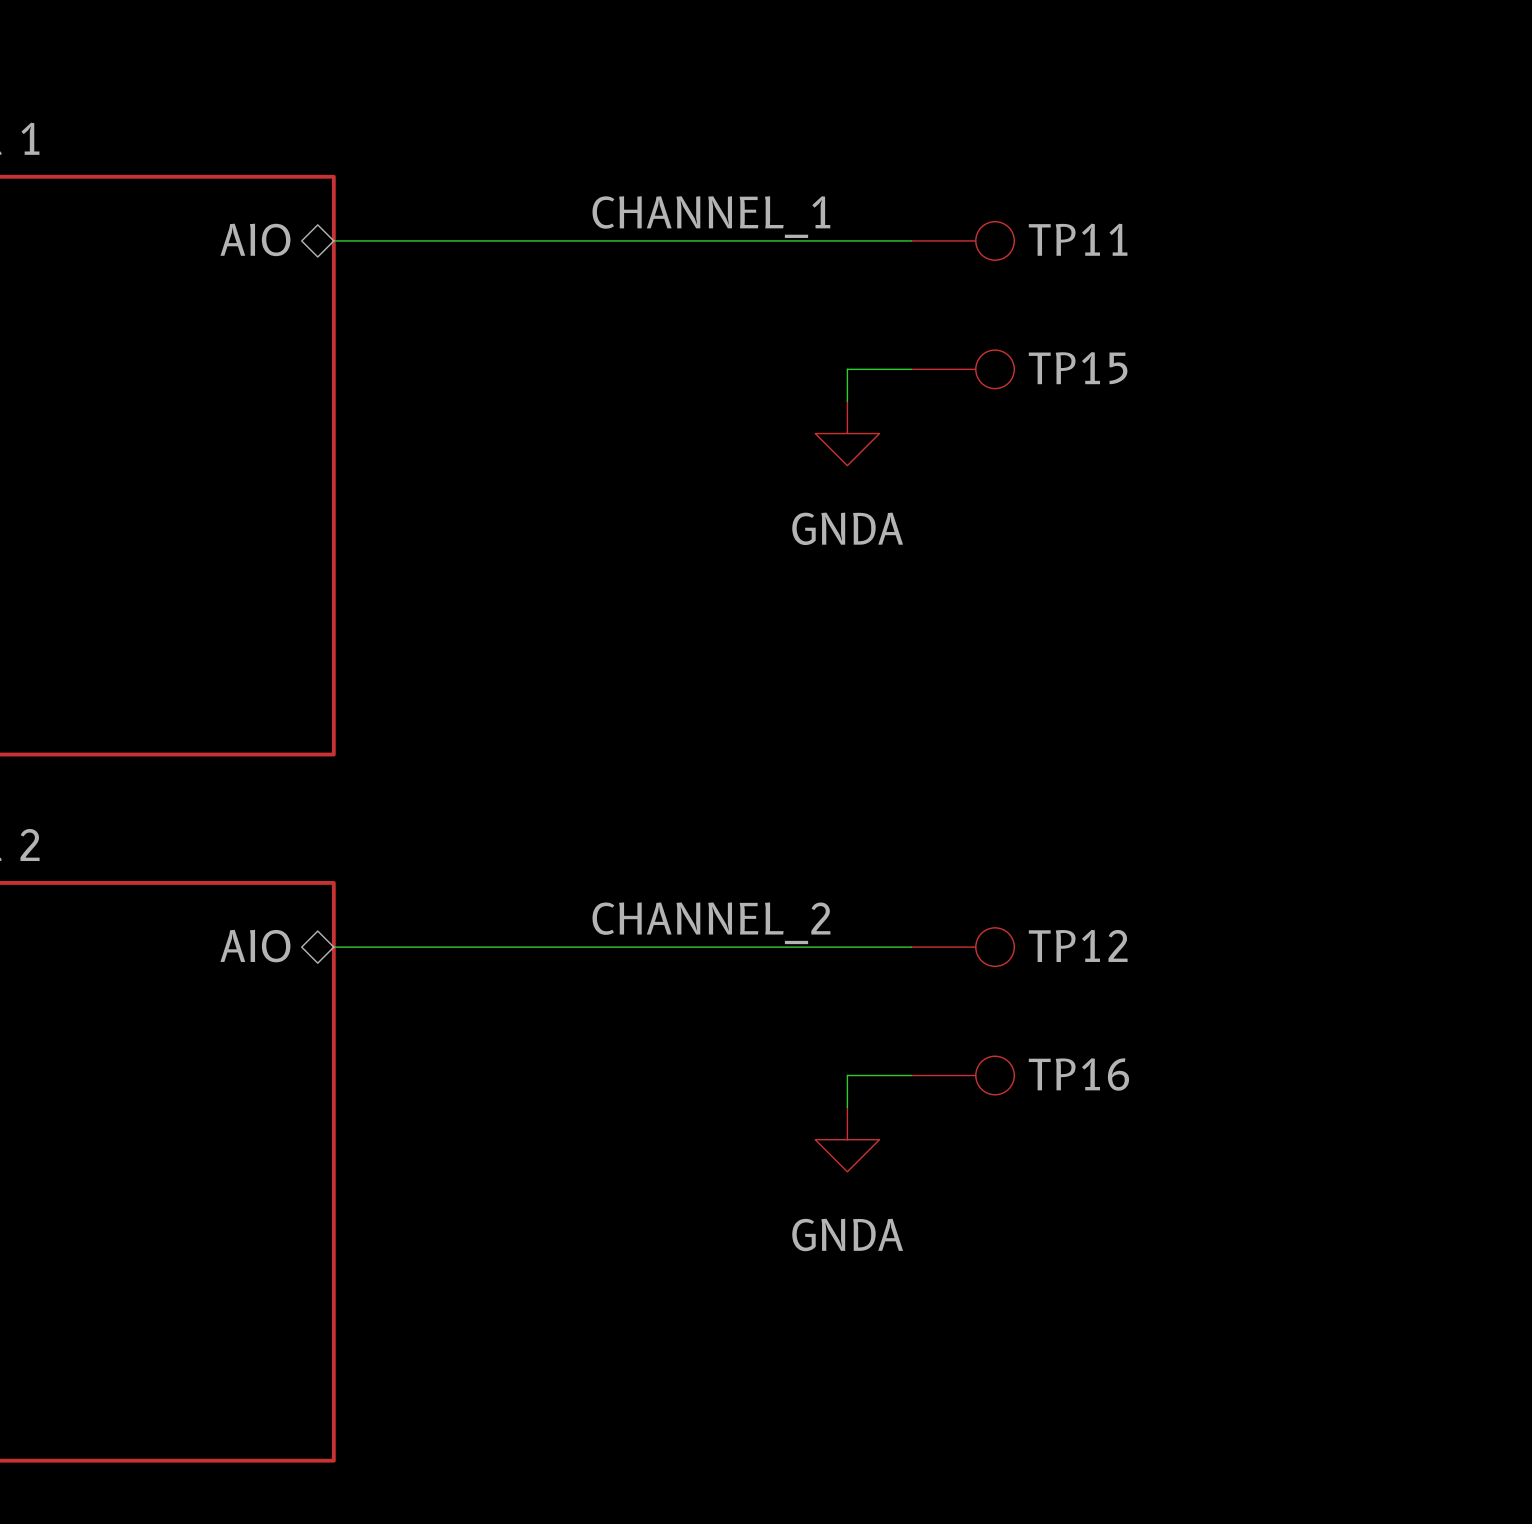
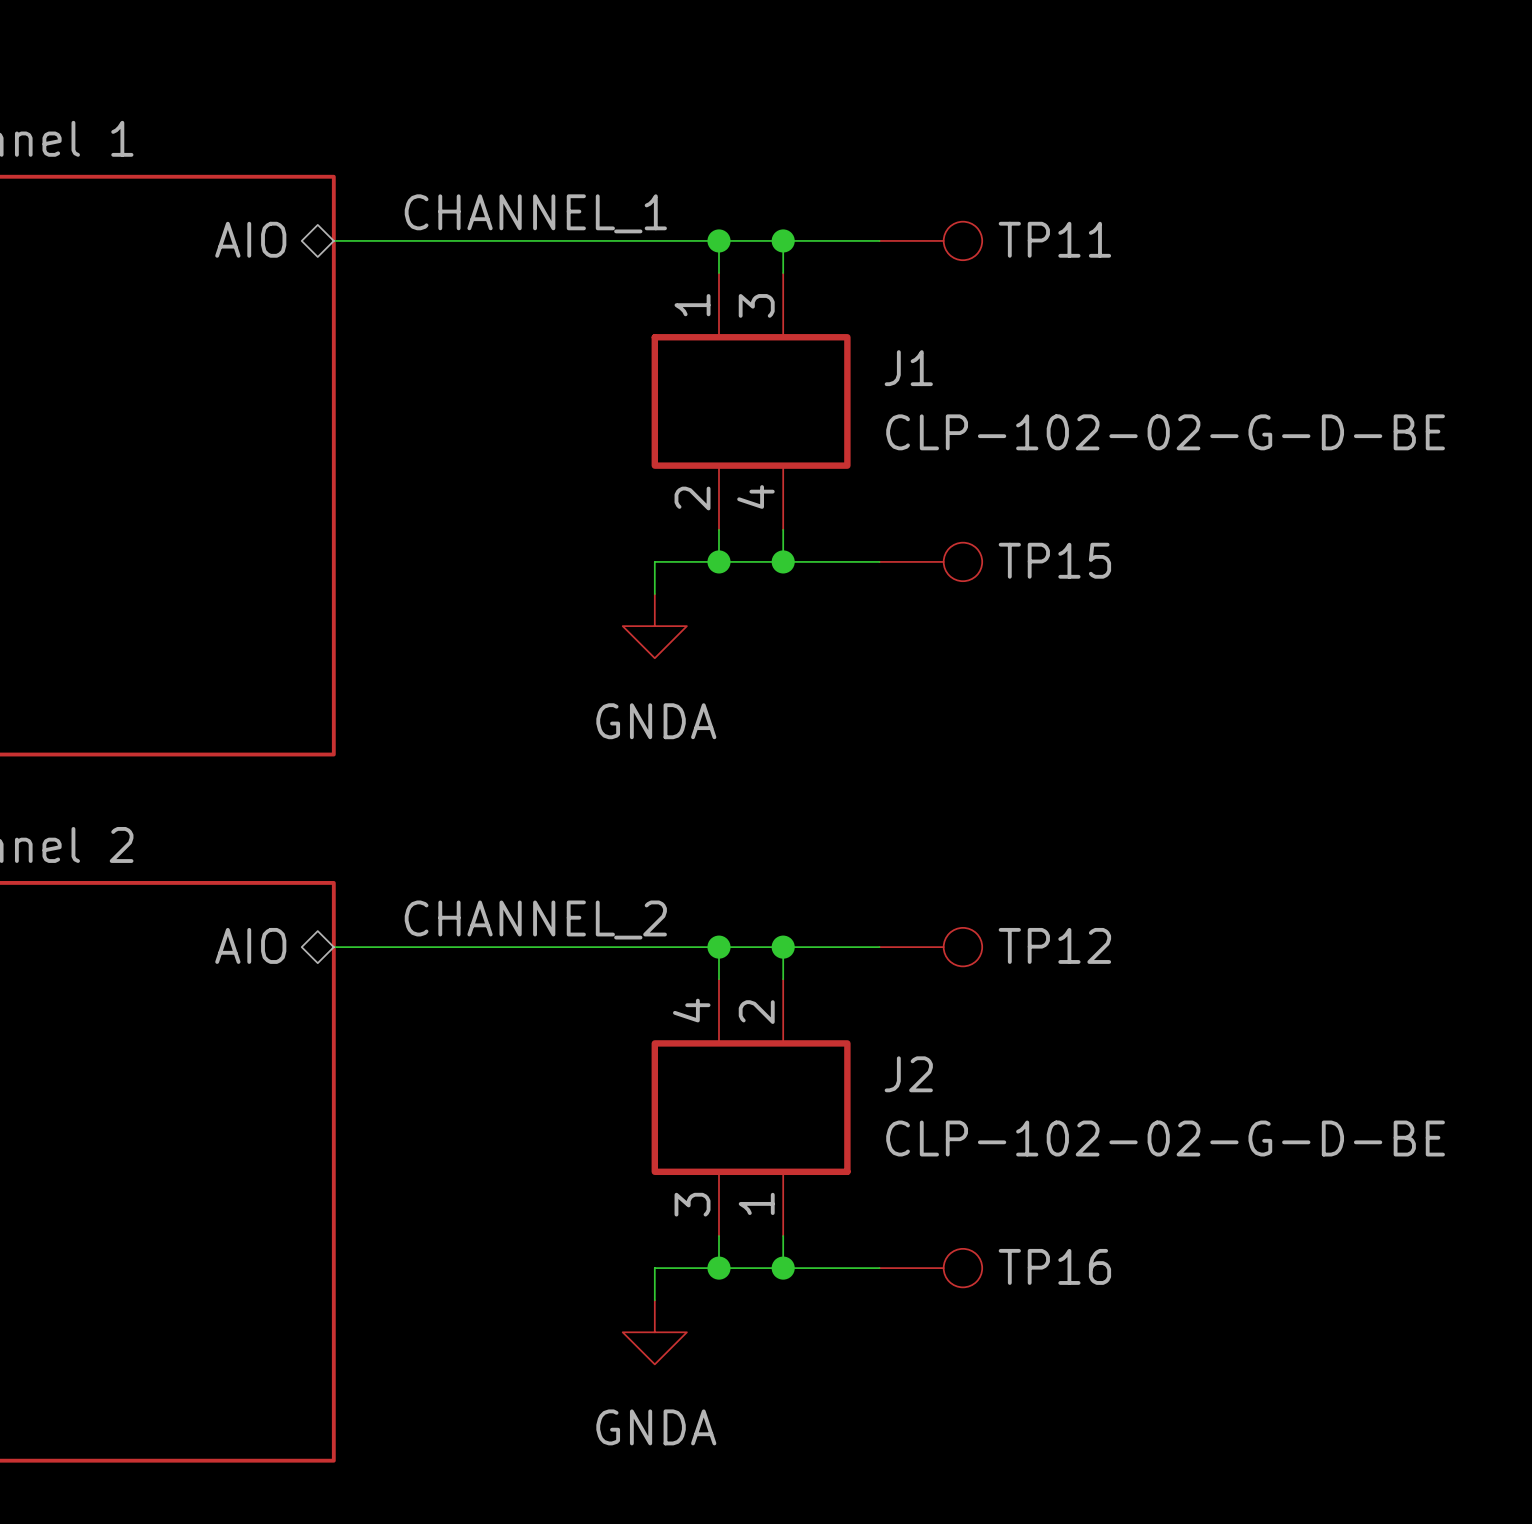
label position: CHANNEL_1 (711, 217) -> CHANNEL_1 (535, 213)
wire: none -> (719, 240) (719, 273)
junction: none -> (719, 240)
wire: none -> (783, 240) (783, 273)
junction: none -> (783, 240)
TP11 position: (962, 240) -> (930, 240)
wire: (911, 369) (847, 369) (847, 401) -> none
TP15 position: (962, 369) -> (930, 561)
J1: none -> CLP-102-02-G-D-BE (751, 401)
power symbol position: GNDA (847, 433) -> GNDA (654, 626)
wire: none -> (719, 529) (719, 561)
wire: none -> (783, 529) (783, 561)
junction: none -> (719, 561)
junction: none -> (783, 561)
wire: none -> (879, 561) (654, 561) (654, 594)
label position: CHANNEL_2 (711, 923) -> CHANNEL_2 (535, 920)
wire: none -> (719, 947) (719, 979)
junction: none -> (719, 947)
wire: none -> (783, 947) (783, 979)
junction: none -> (783, 947)
TP12 position: (962, 947) -> (930, 947)
wire: (911, 1075) (847, 1075) (847, 1107) -> none
TP16 position: (962, 1075) -> (930, 1268)
J2: none -> CLP-102-02-G-D-BE (751, 1107)
power symbol position: GNDA (847, 1139) -> GNDA (654, 1332)
wire: none -> (719, 1236) (719, 1268)
wire: none -> (783, 1236) (783, 1268)
junction: none -> (719, 1268)
junction: none -> (783, 1268)
wire: none -> (879, 1268) (654, 1268) (654, 1300)

